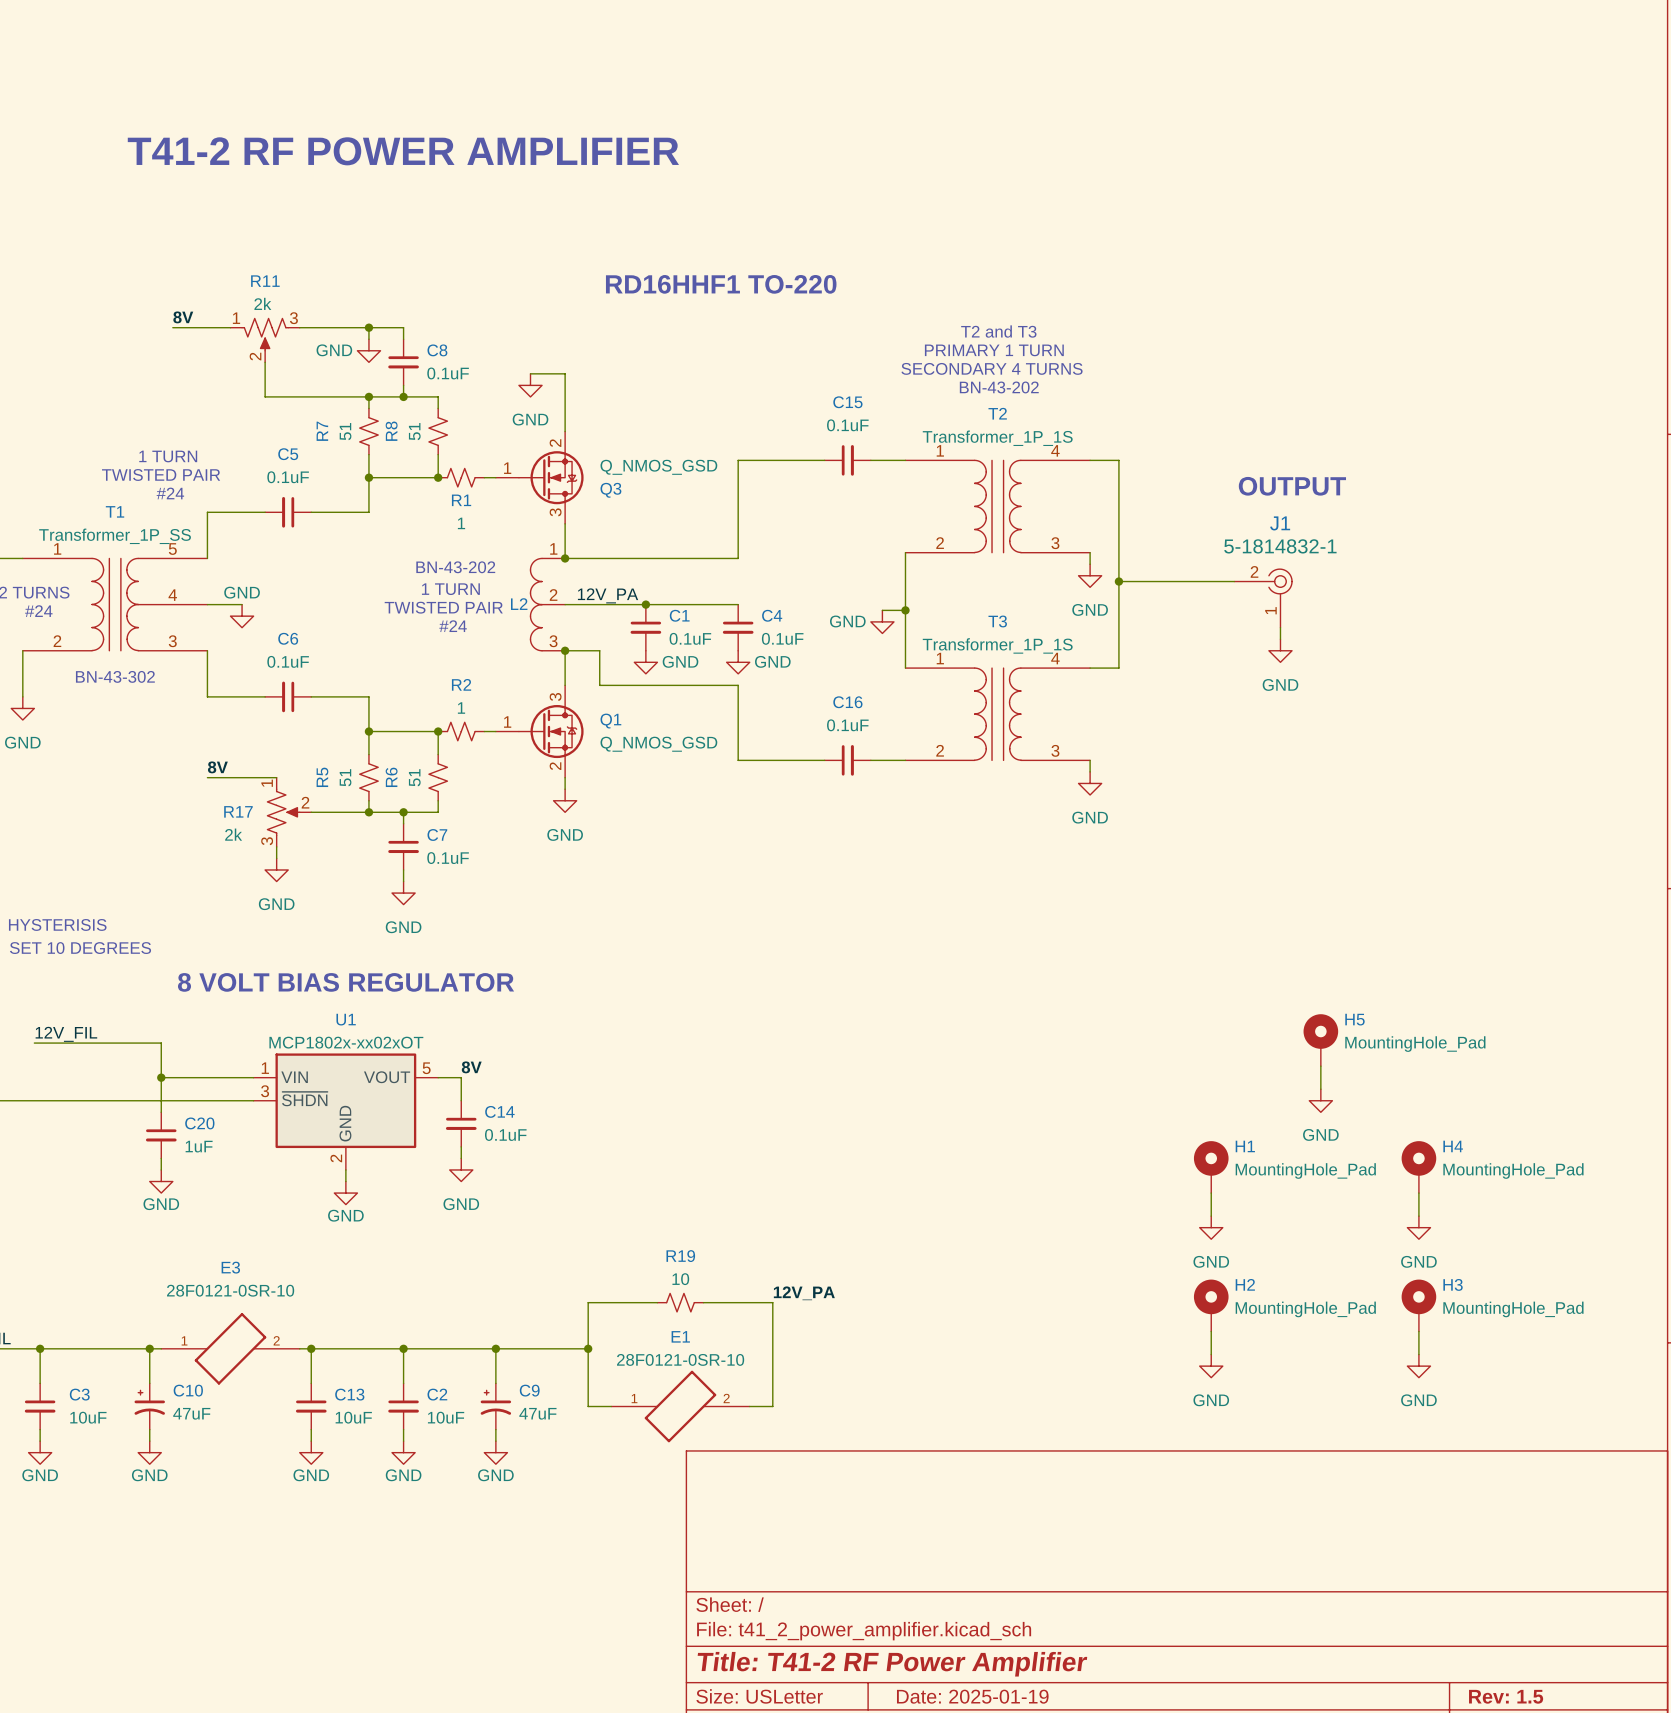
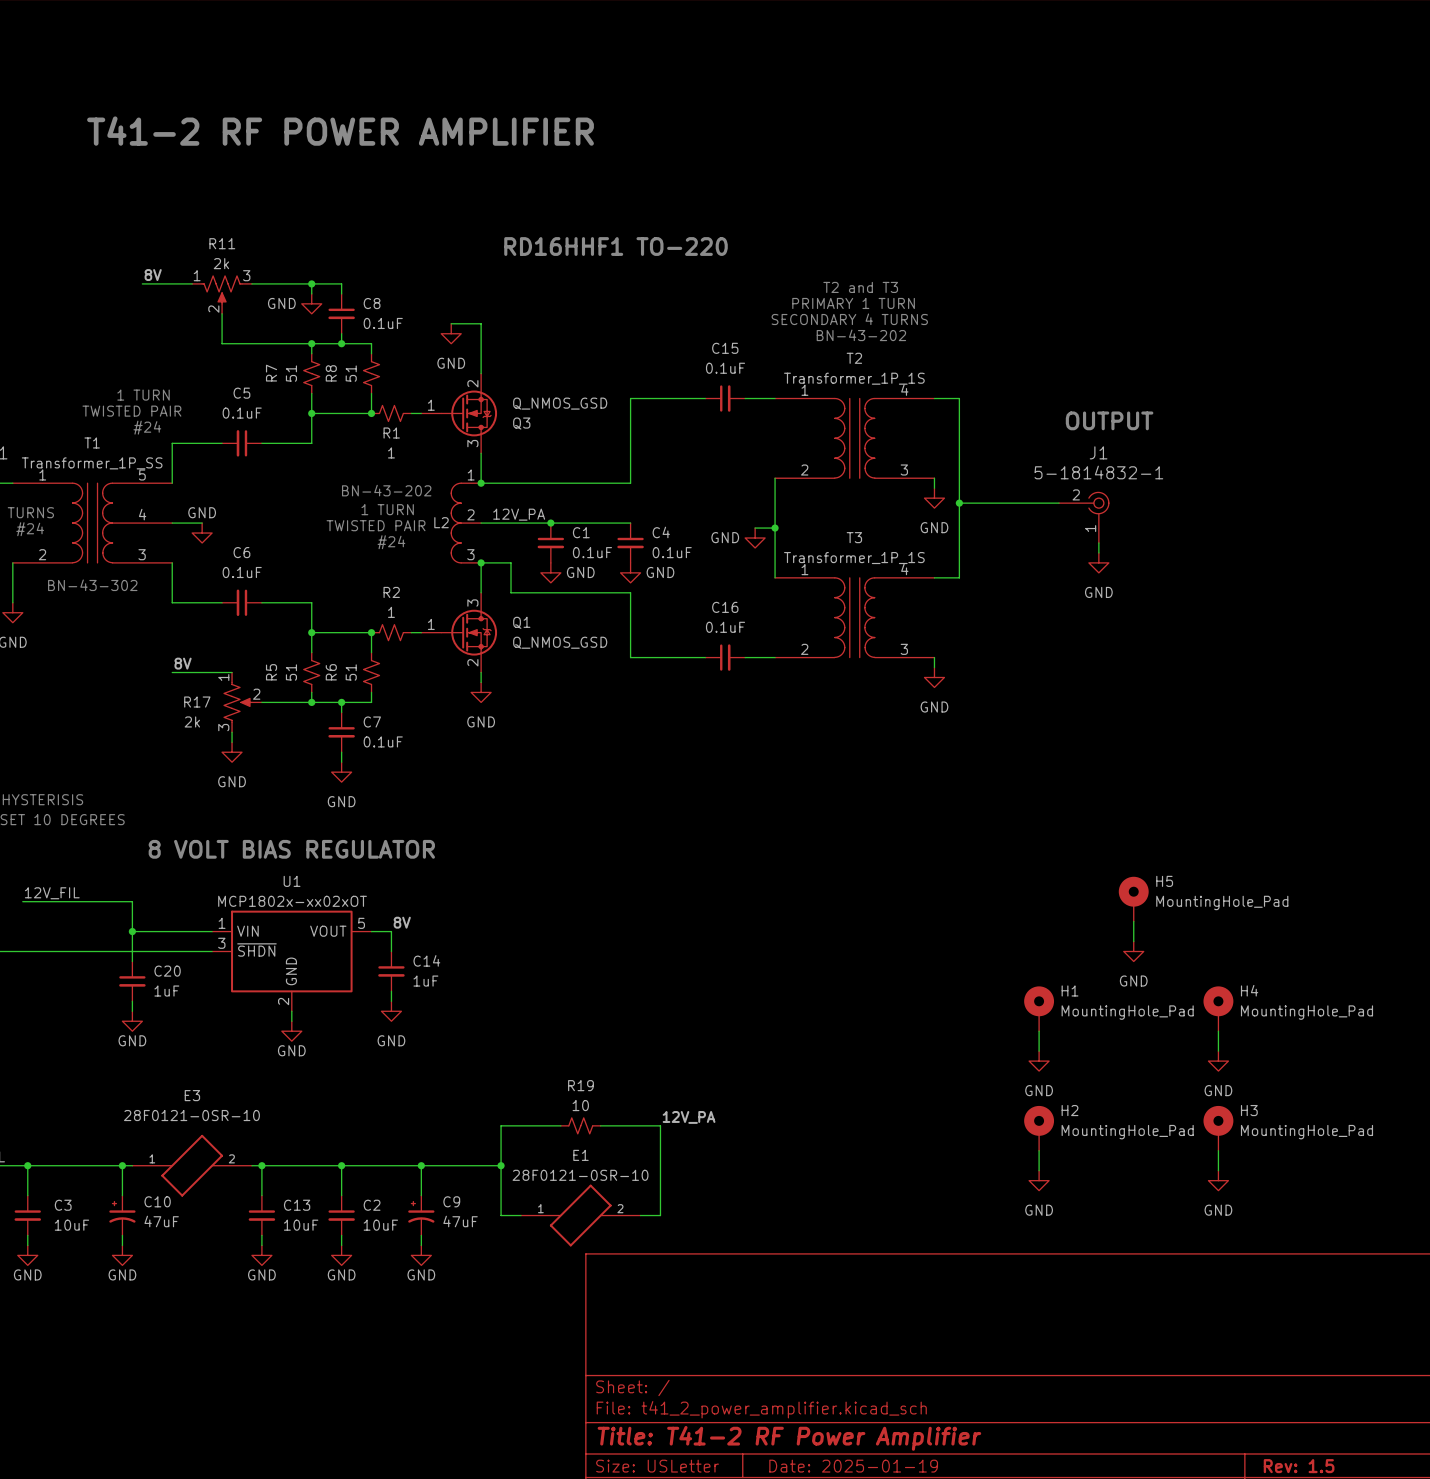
C14 value: 0.1uF (505, 1134) -> 1uF (425, 981)

